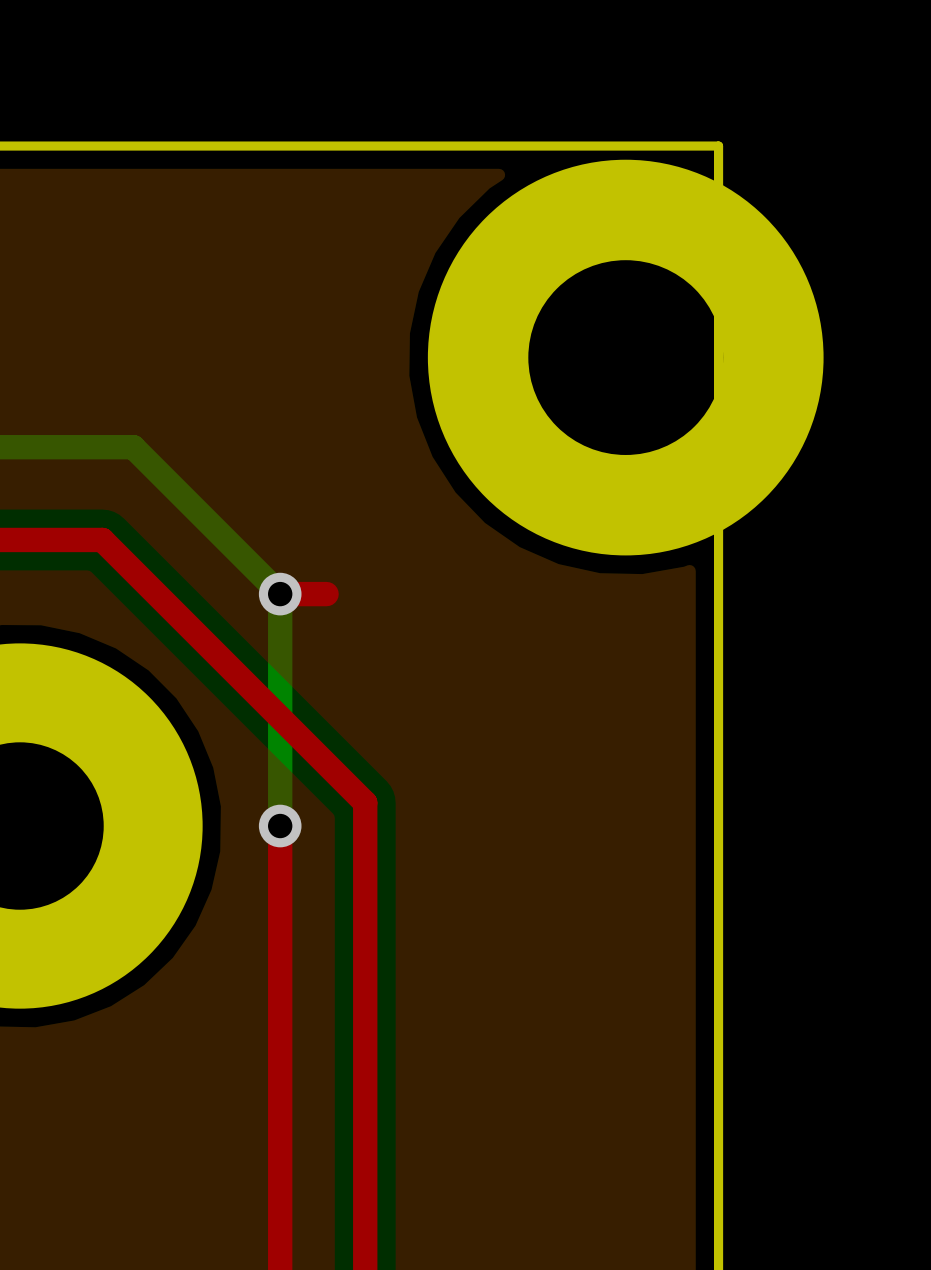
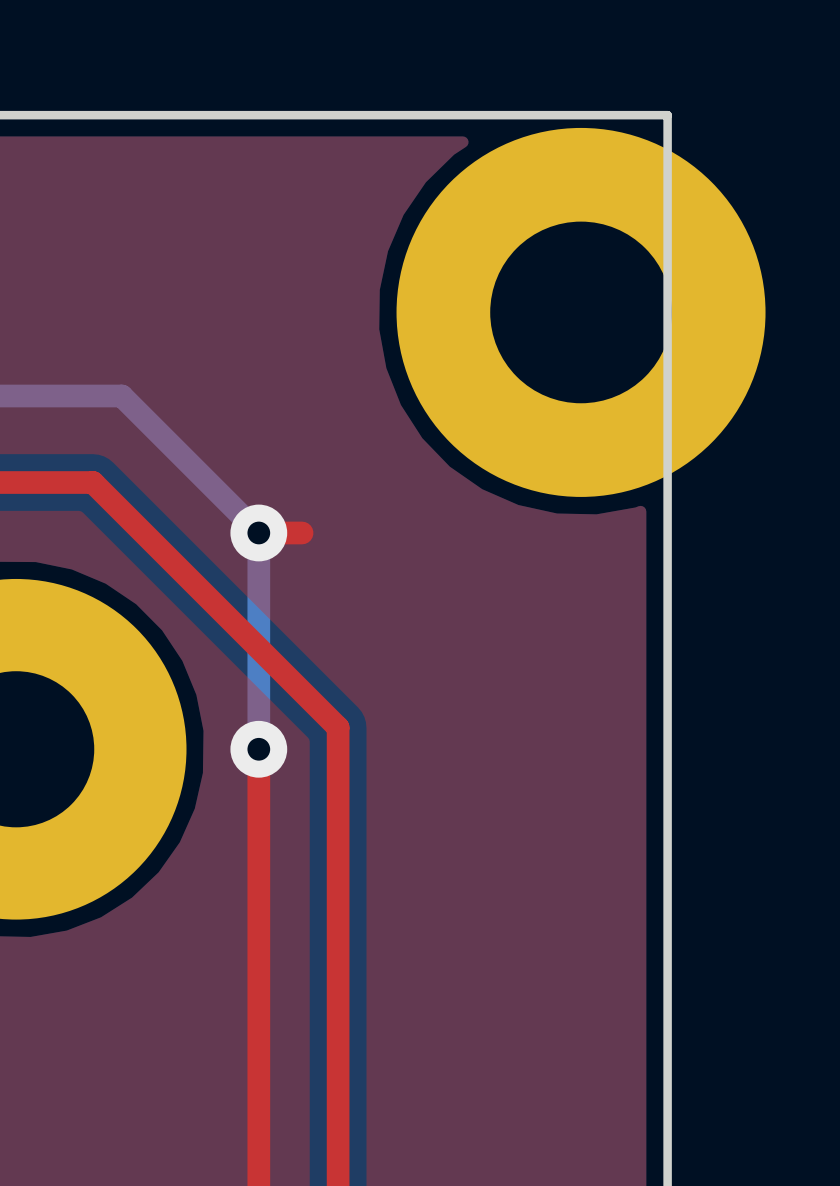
via size: [258, 572, 302, 616] -> [230, 504, 288, 562]
via size: [258, 804, 302, 848] -> [230, 720, 288, 778]

